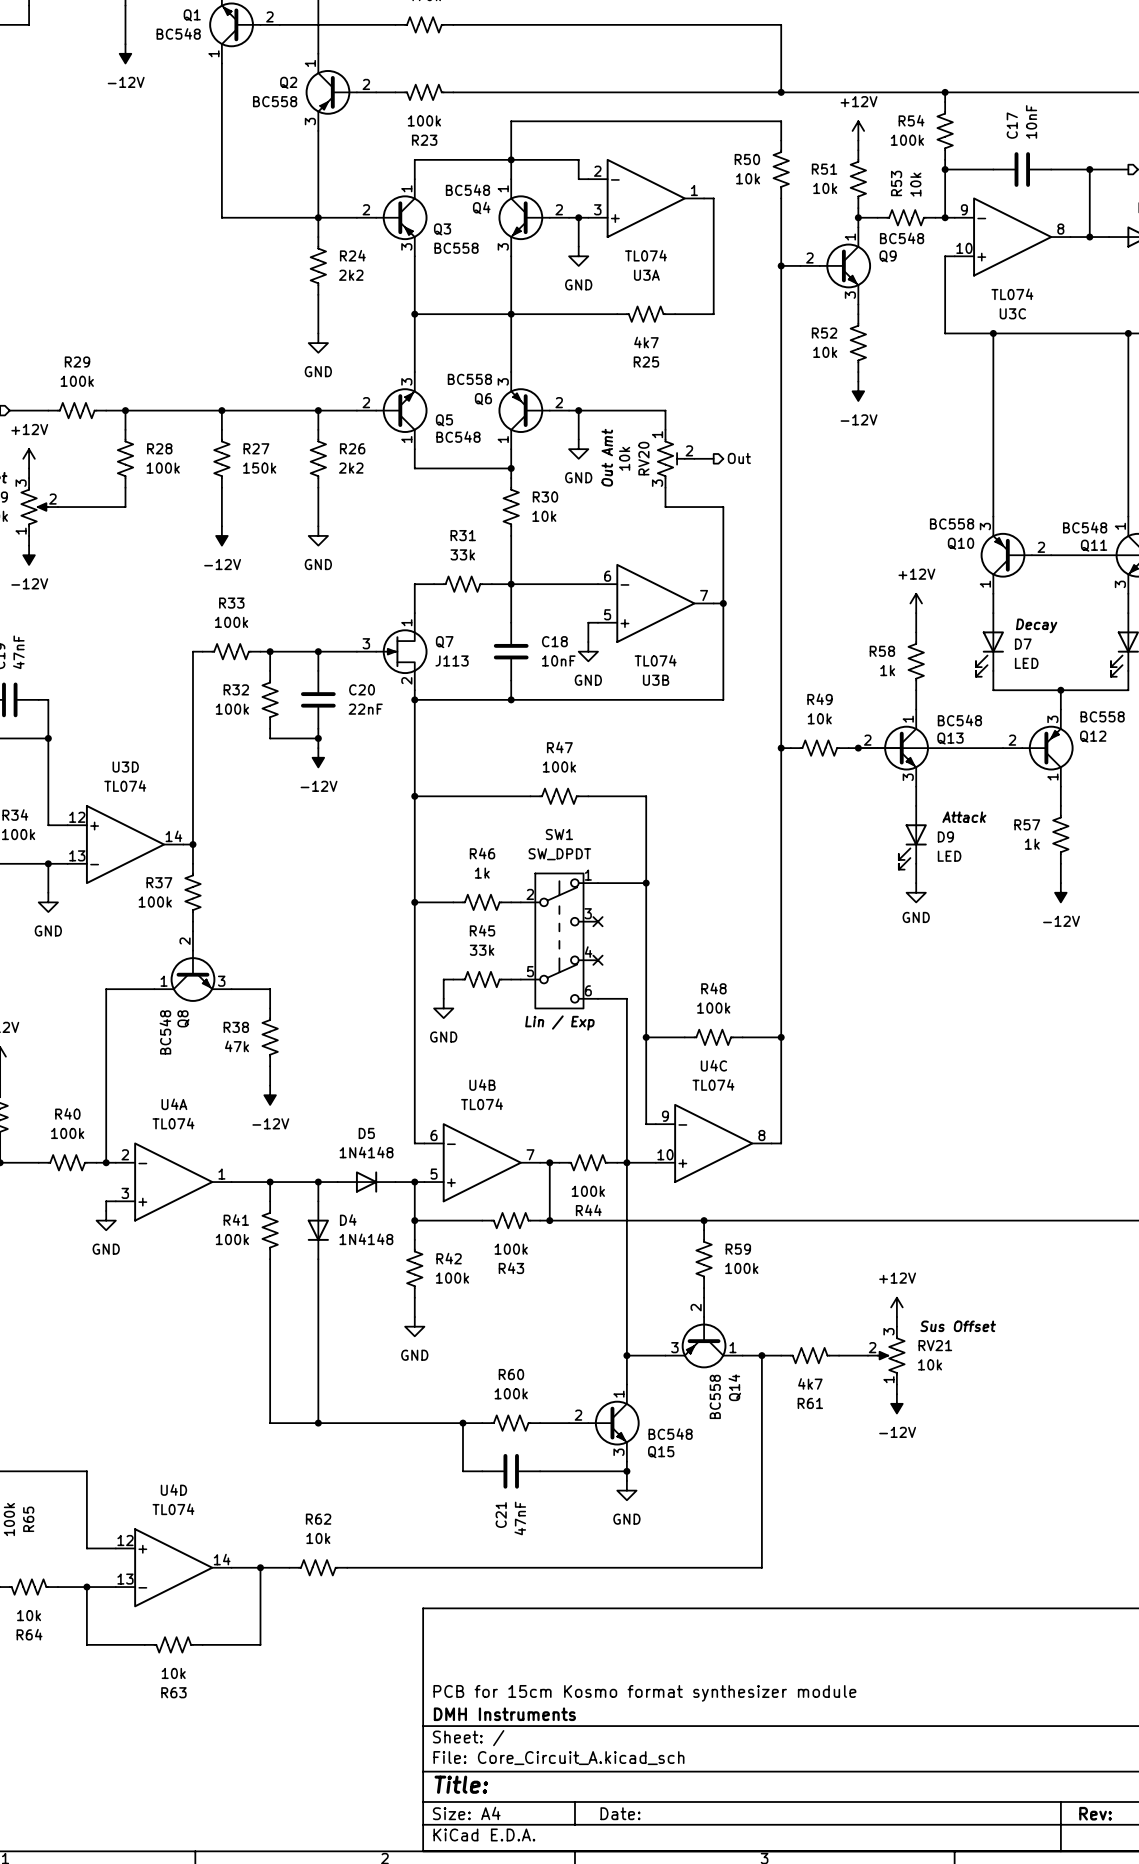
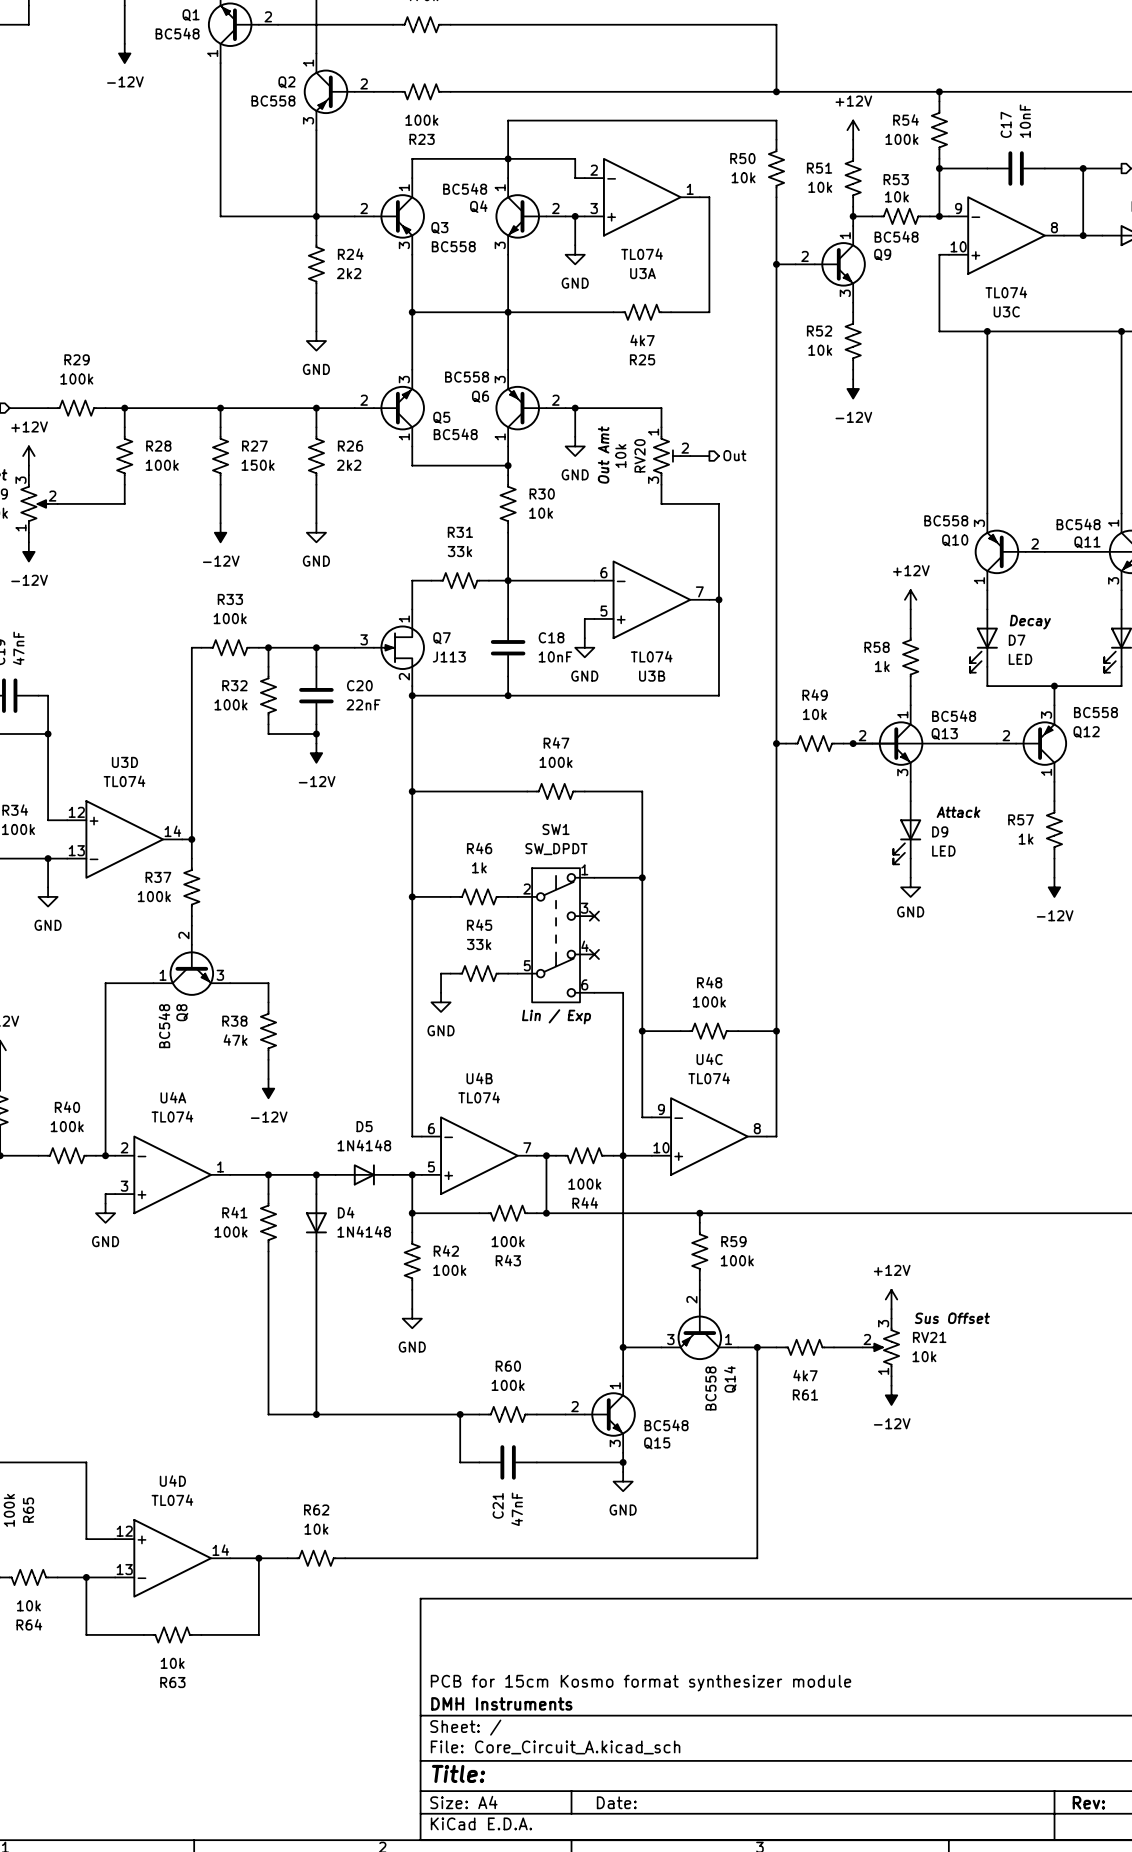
R53 name rotation: 0° (896, 183) -> 90° clockwise (896, 179)
R53 value rotation: 0° (915, 184) -> 90° clockwise (896, 196)

